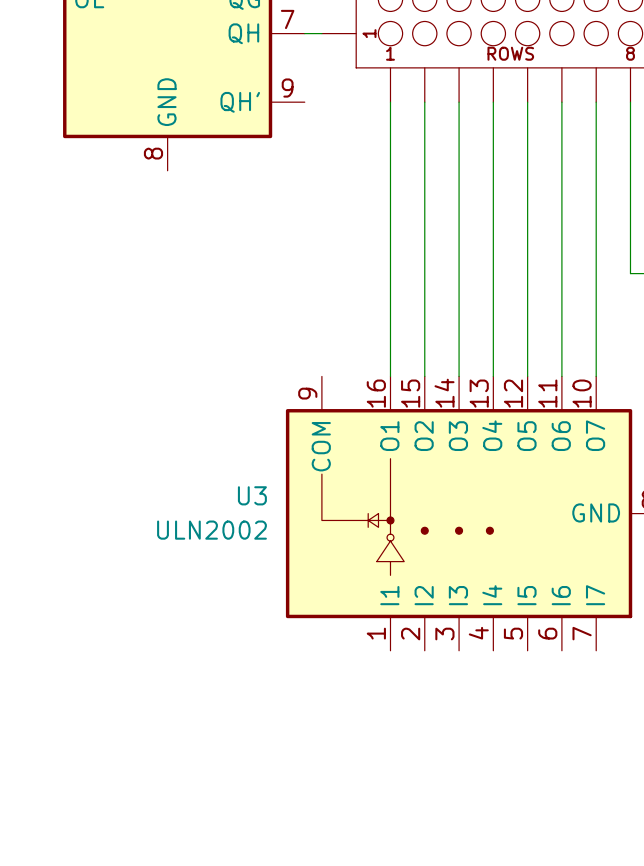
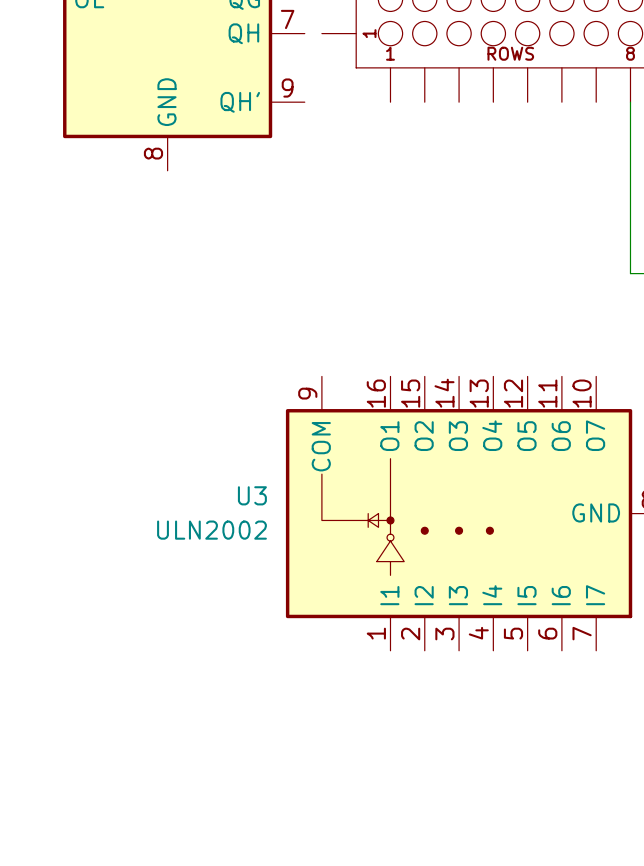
wire: (304, 33) (321, 33) -> none
wire: (390, 102) (390, 376) -> none
wire: (424, 102) (424, 376) -> none
wire: (459, 102) (459, 376) -> none
wire: (493, 102) (493, 376) -> none
wire: (527, 102) (527, 376) -> none
wire: (561, 102) (561, 376) -> none
wire: (596, 102) (596, 376) -> none

